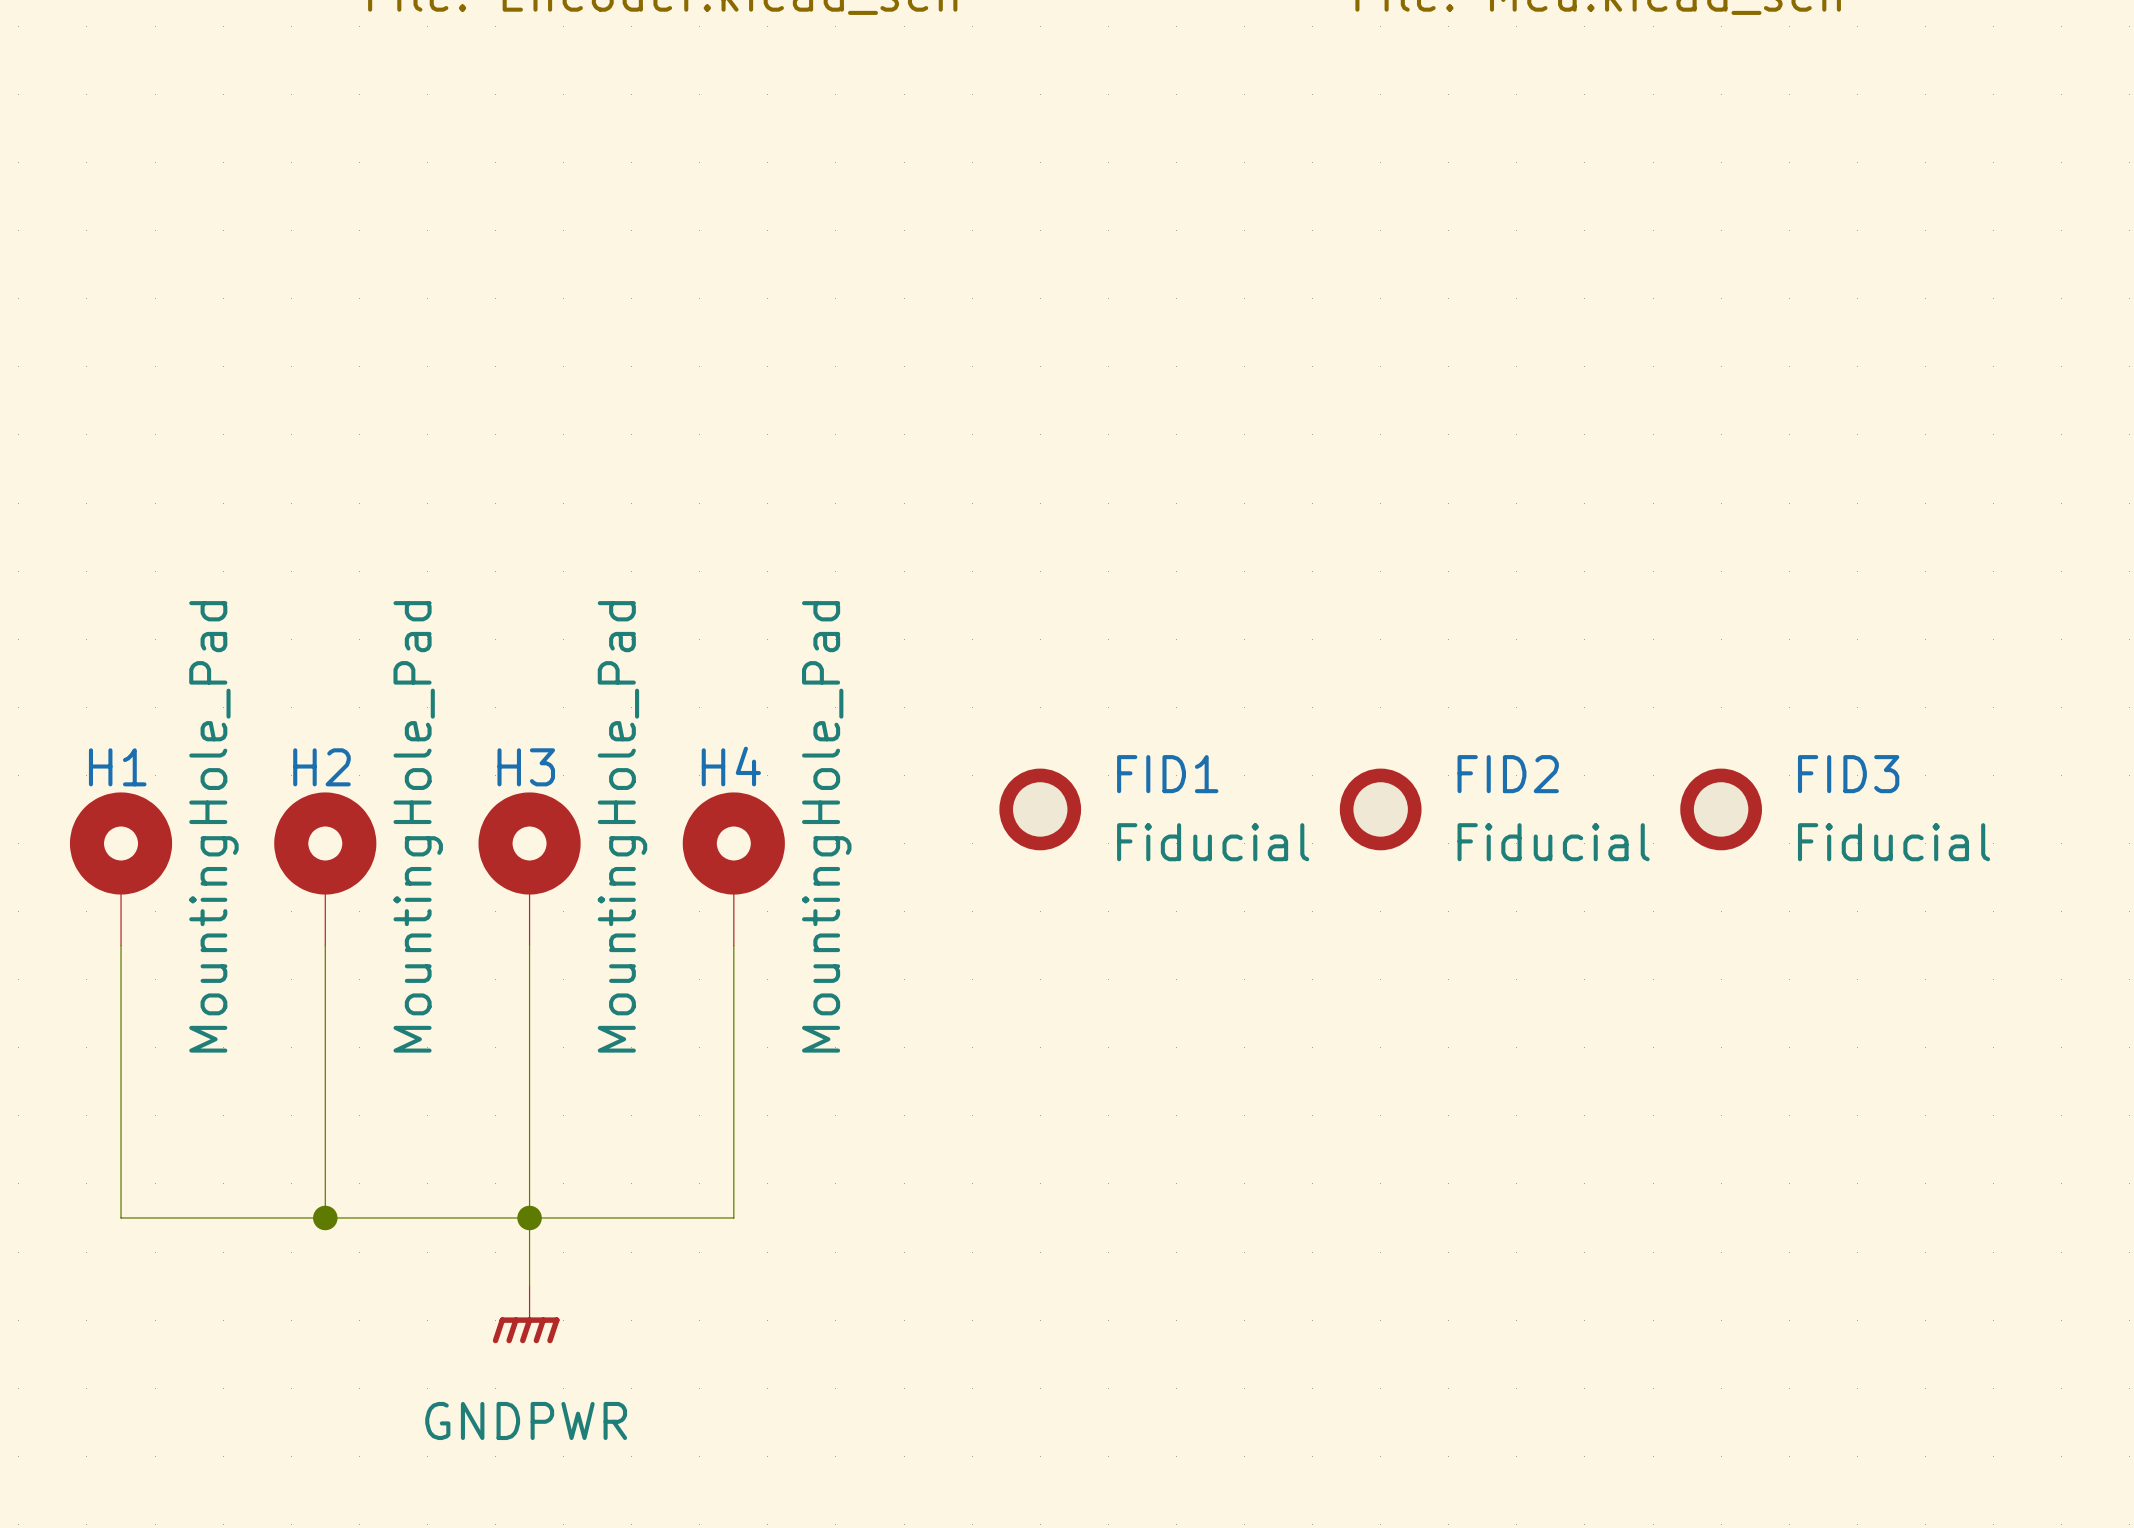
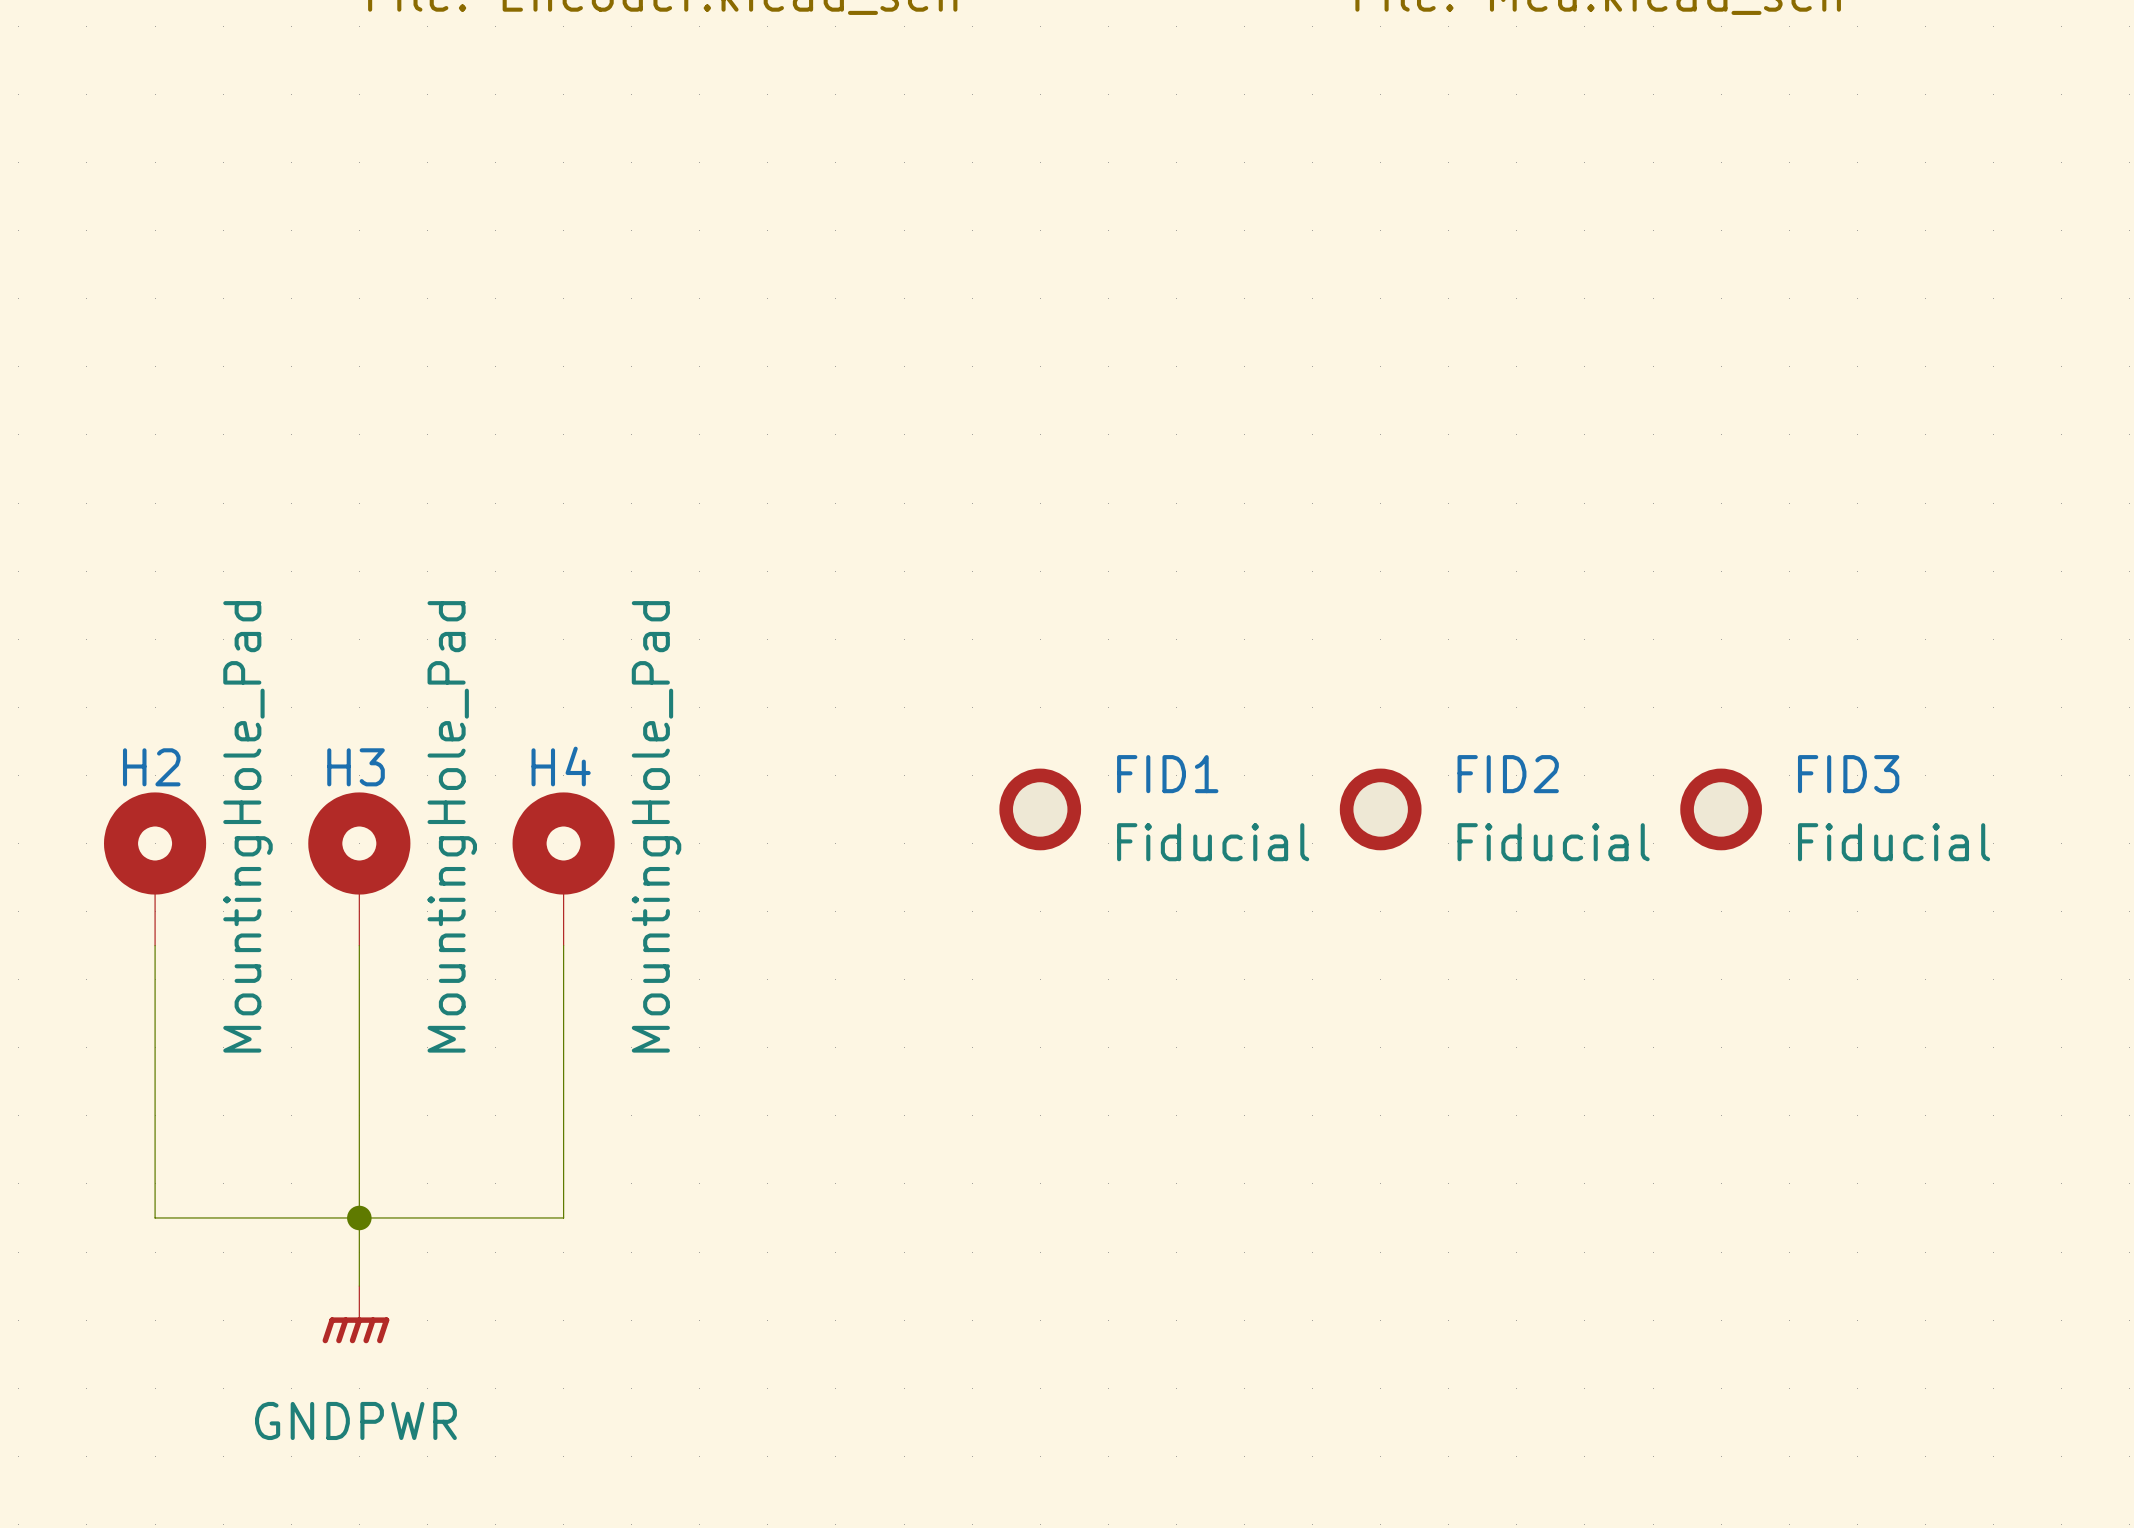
H1: MountingHole_Pad (121, 869) -> none
H2 position: (325, 869) -> (155, 869)
H3 position: (529, 869) -> (359, 869)
H4 position: (733, 869) -> (563, 869)
wire: (121, 945) (121, 1217) (155, 1217) -> (155, 945) (155, 1217)
wire: (325, 945) (325, 1217) -> none
wire: (529, 945) (529, 1286) -> (359, 945) (359, 1286)
wire: (733, 945) (733, 1217) (563, 1217) -> (563, 945) (563, 1217)
junction position: (325, 1217) -> (359, 1217)
junction: (529, 1217) -> none
power symbol position: GNDPWR (526, 1314) -> GNDPWR (355, 1314)

